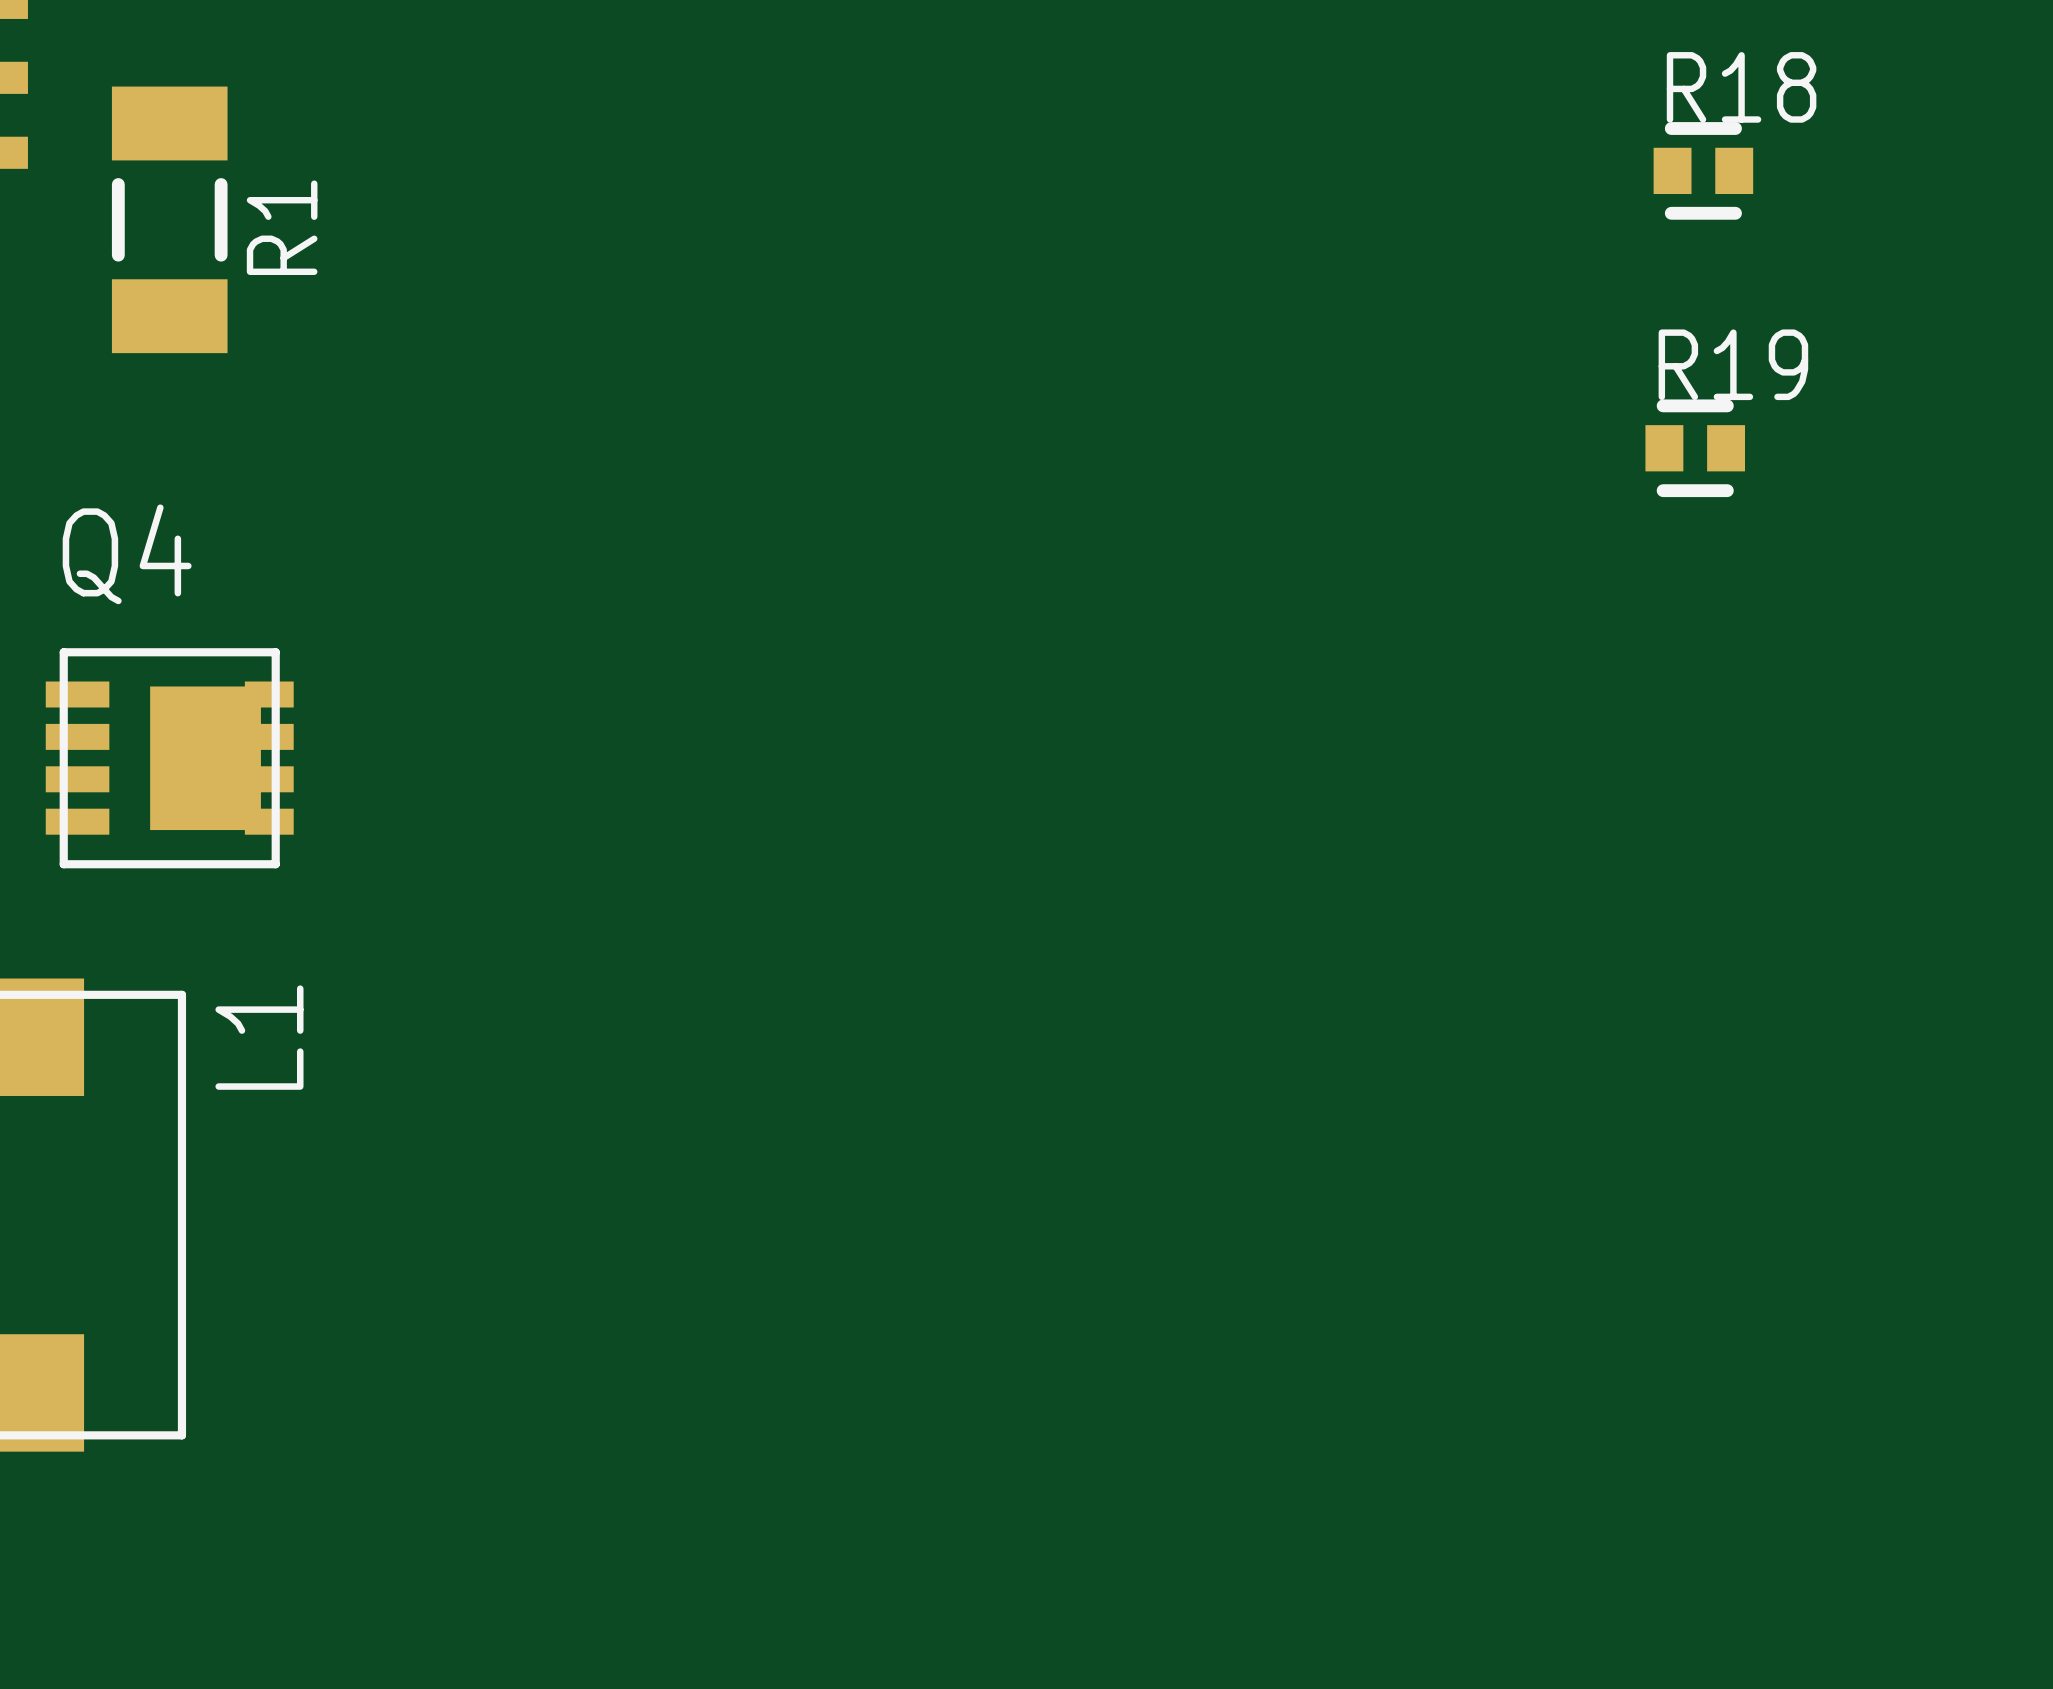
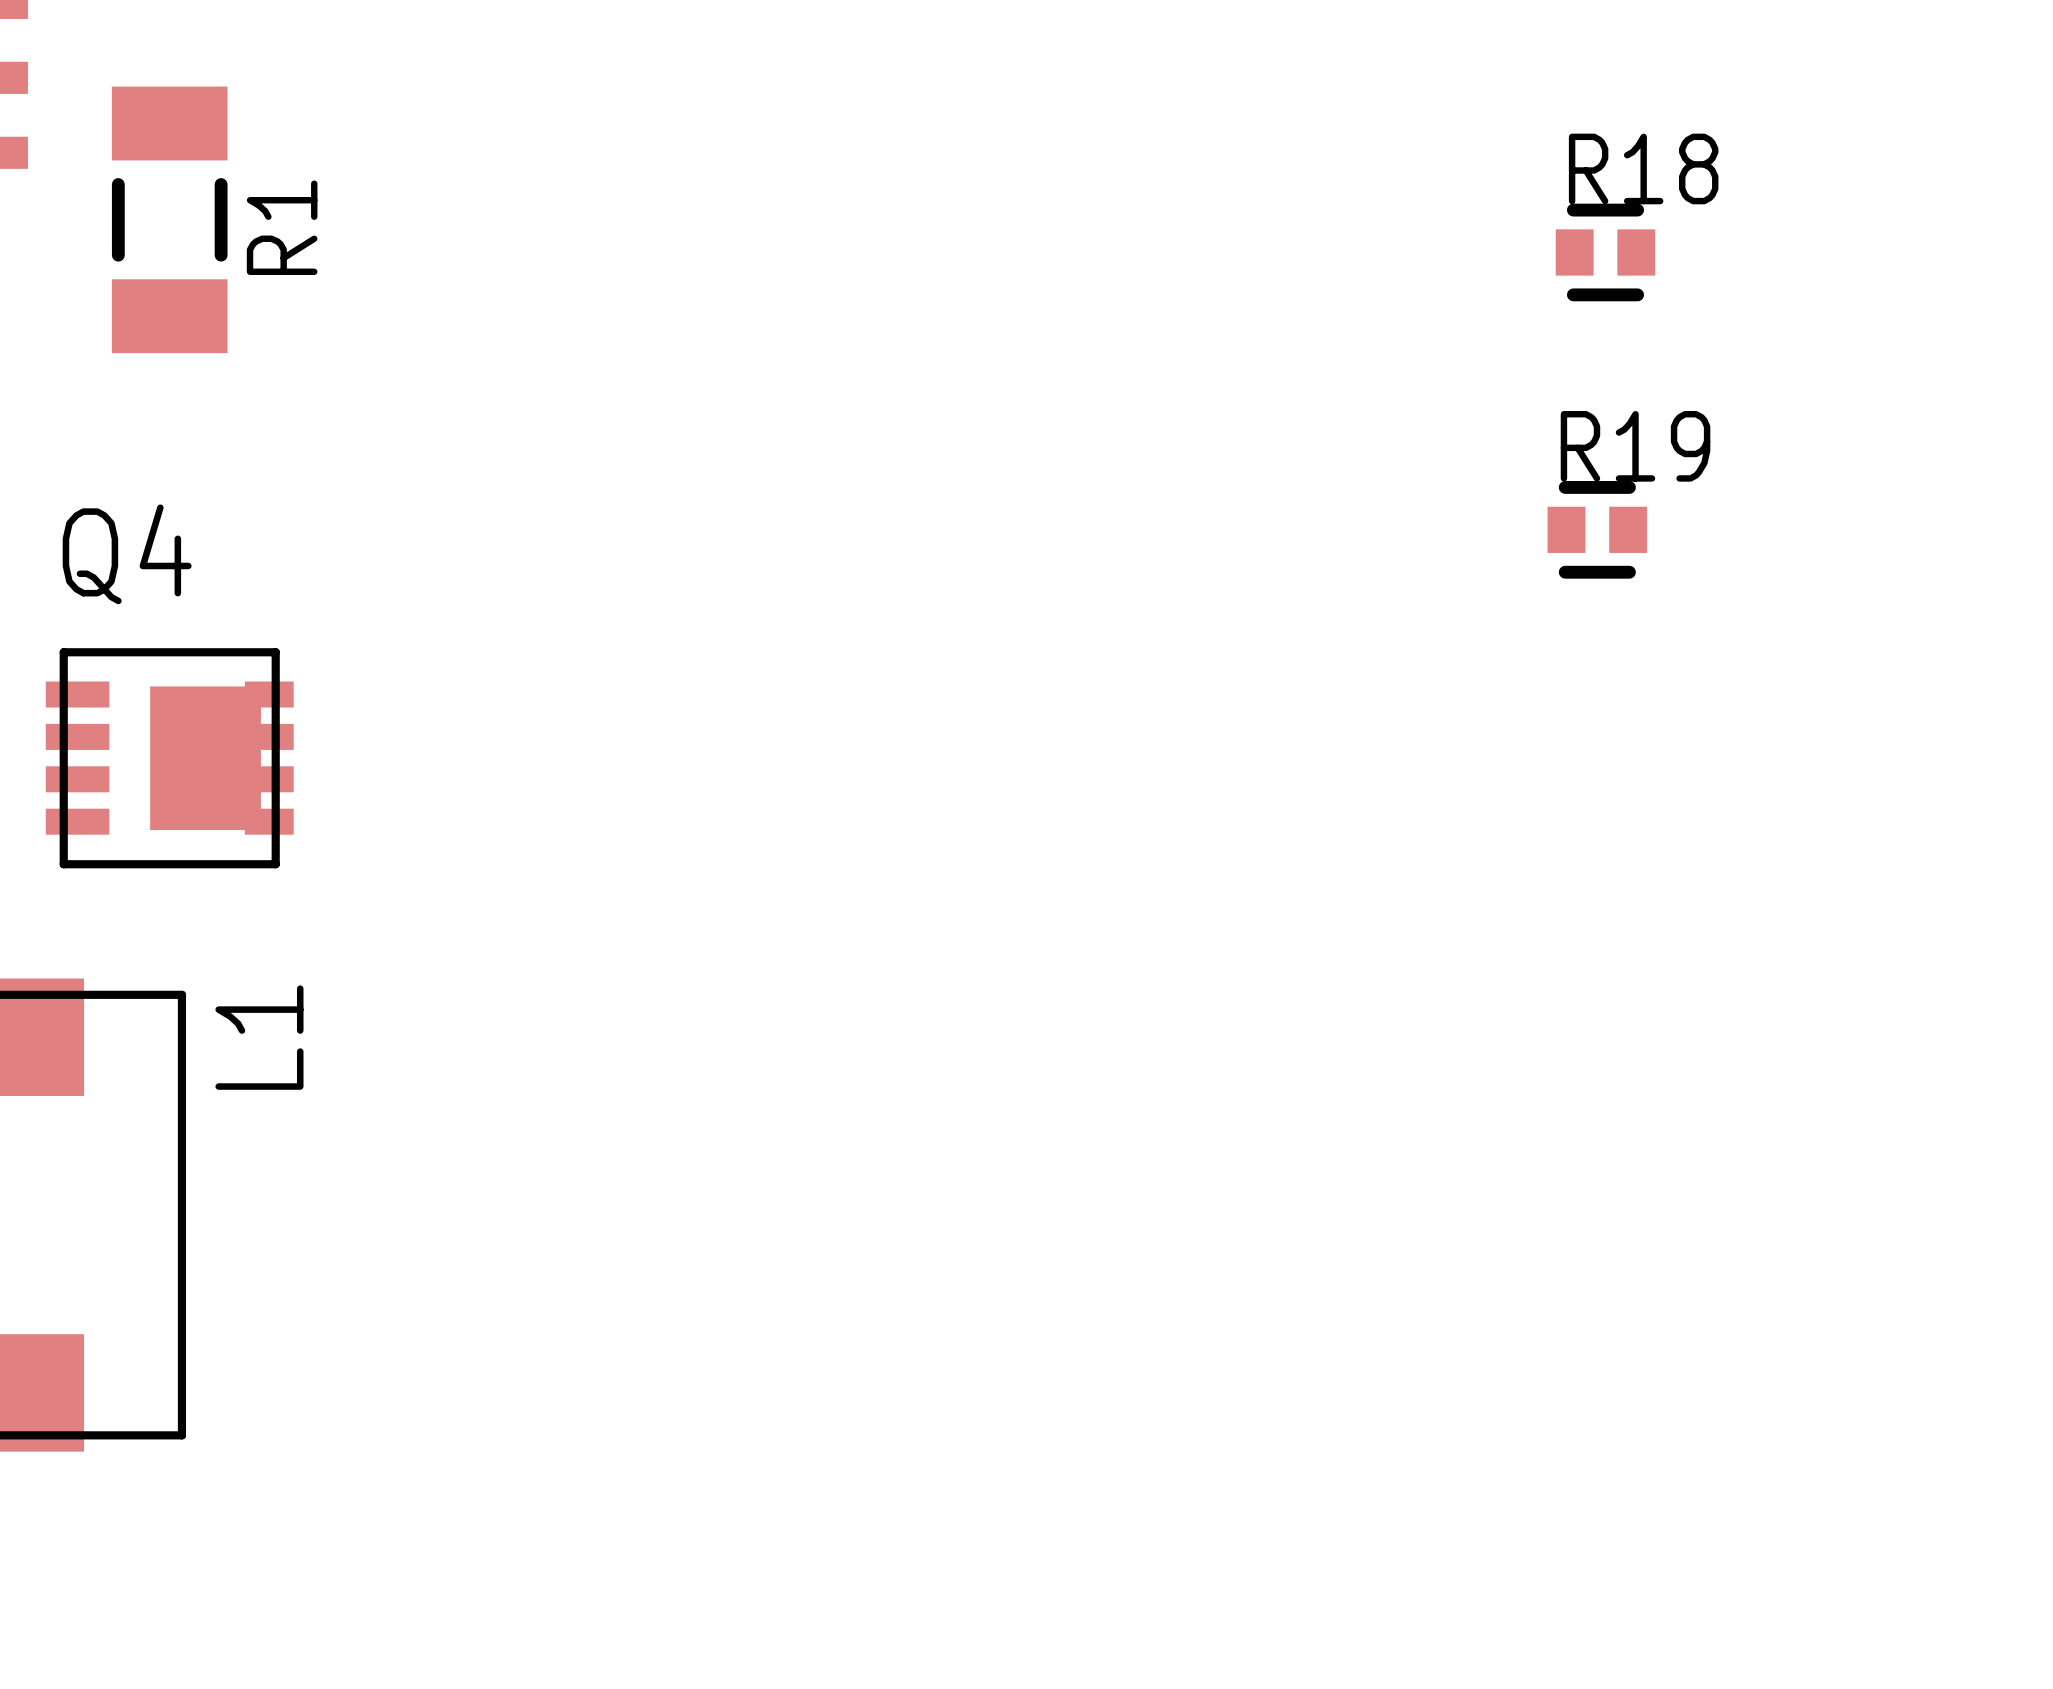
R18 position: (1703, 170) -> (1605, 252)
R19 position: (1695, 448) -> (1597, 529)

